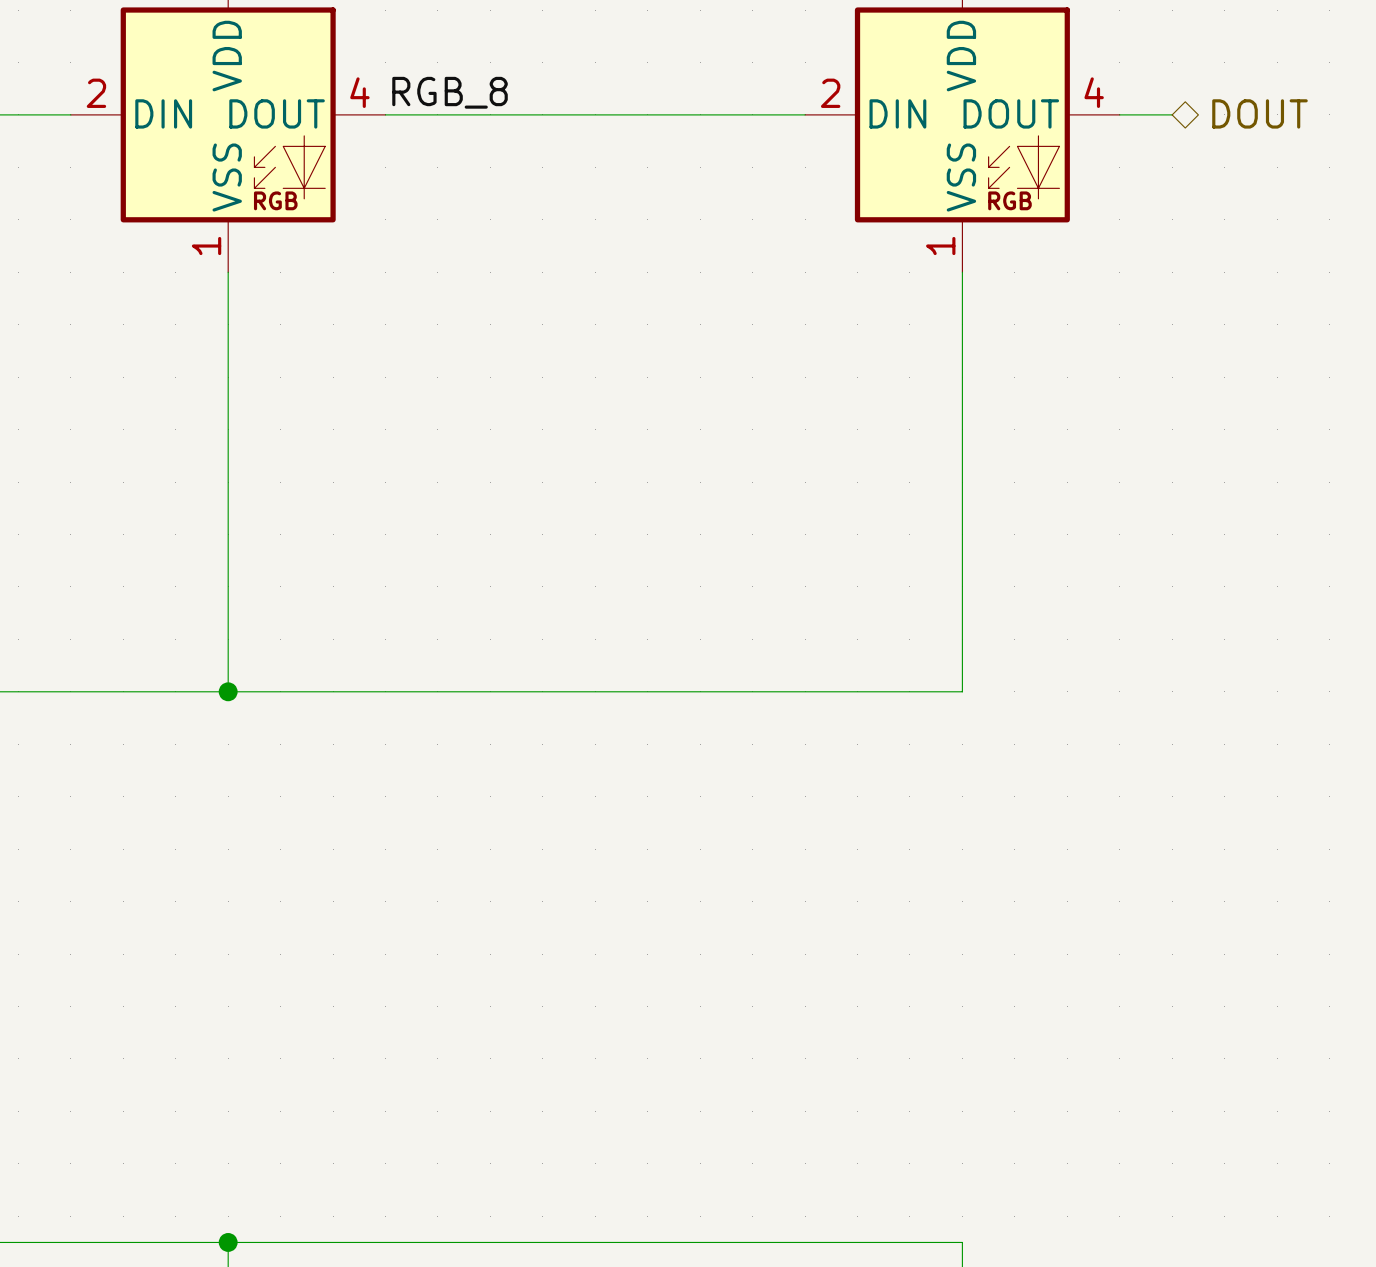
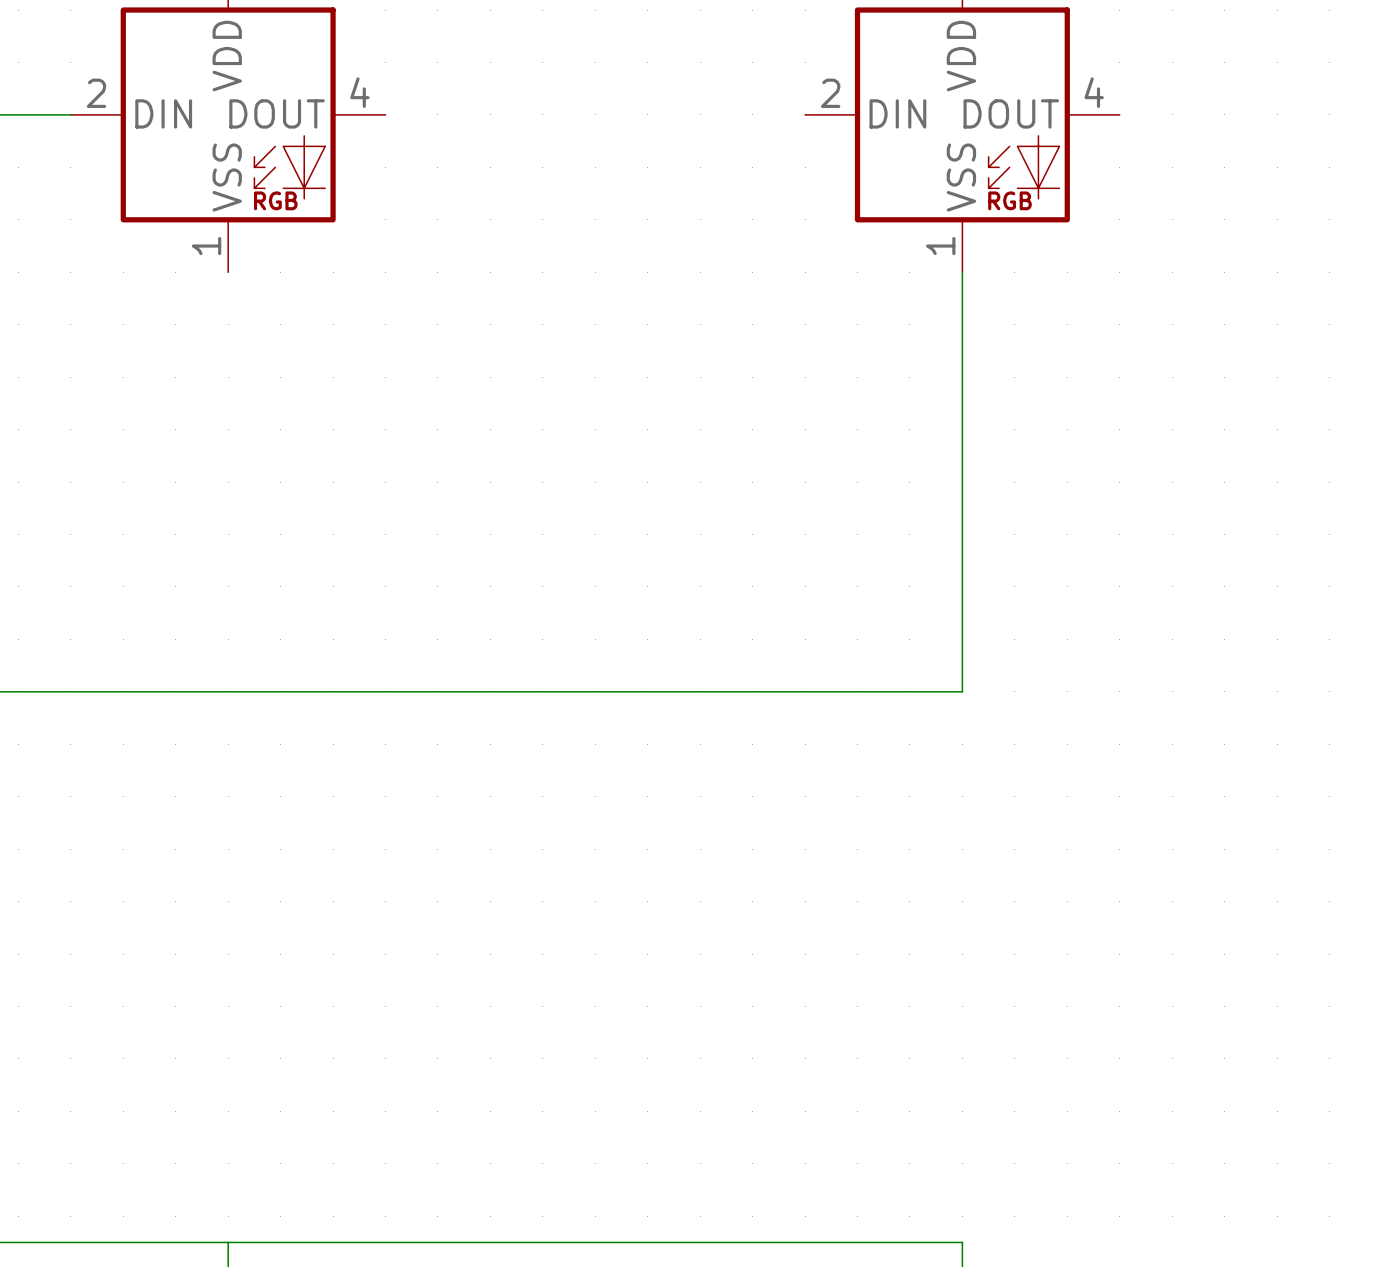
label: RGB_8 (450, 92) -> none
hierarchical label: DOUT (1259, 113) -> none
wire: (385, 114) (805, 114) -> none
wire: (1119, 114) (1172, 114) -> none
wire: (228, 272) (228, 691) -> none
junction: (228, 691) -> none
junction: (228, 1242) -> none

